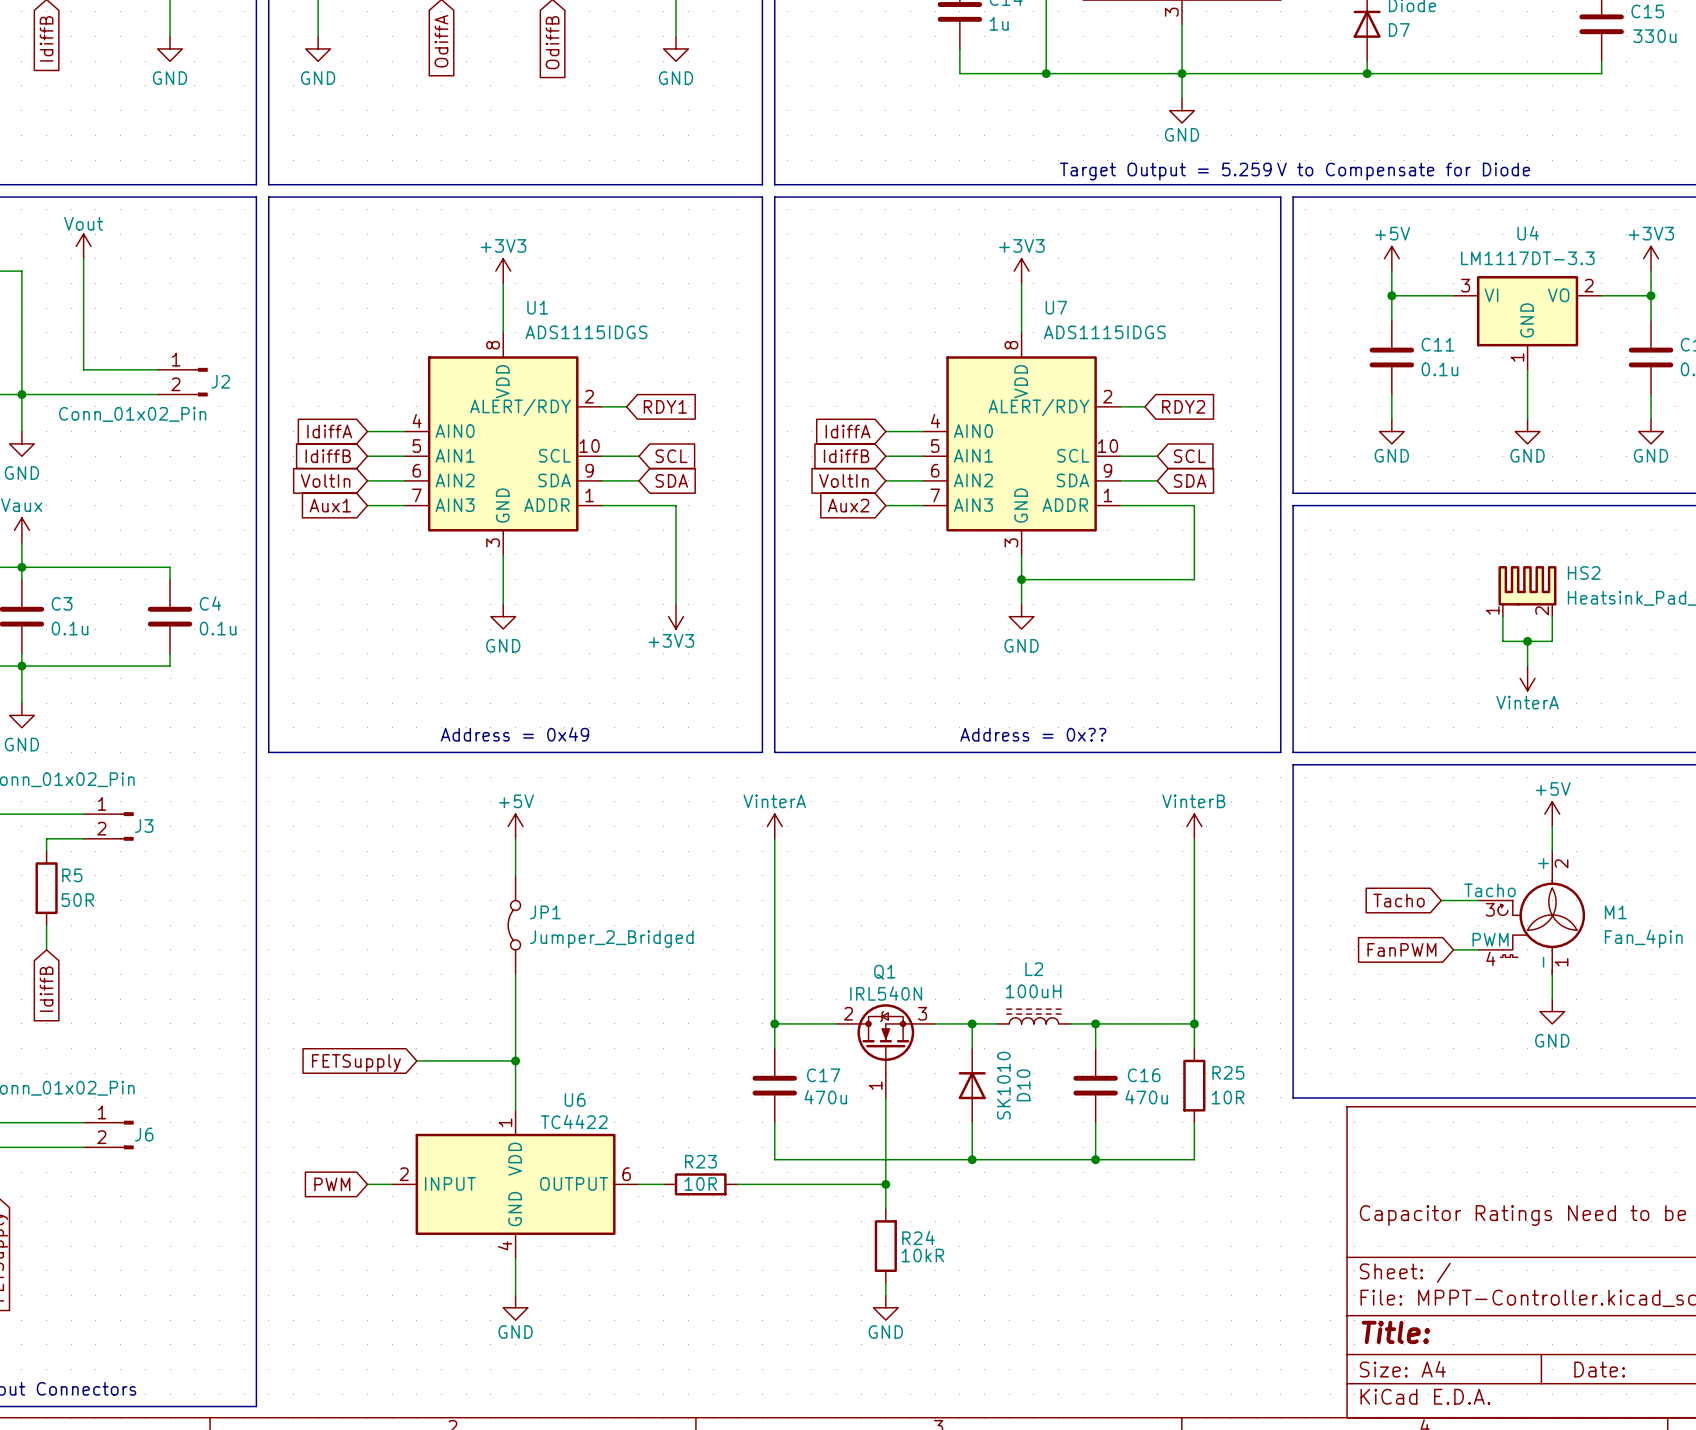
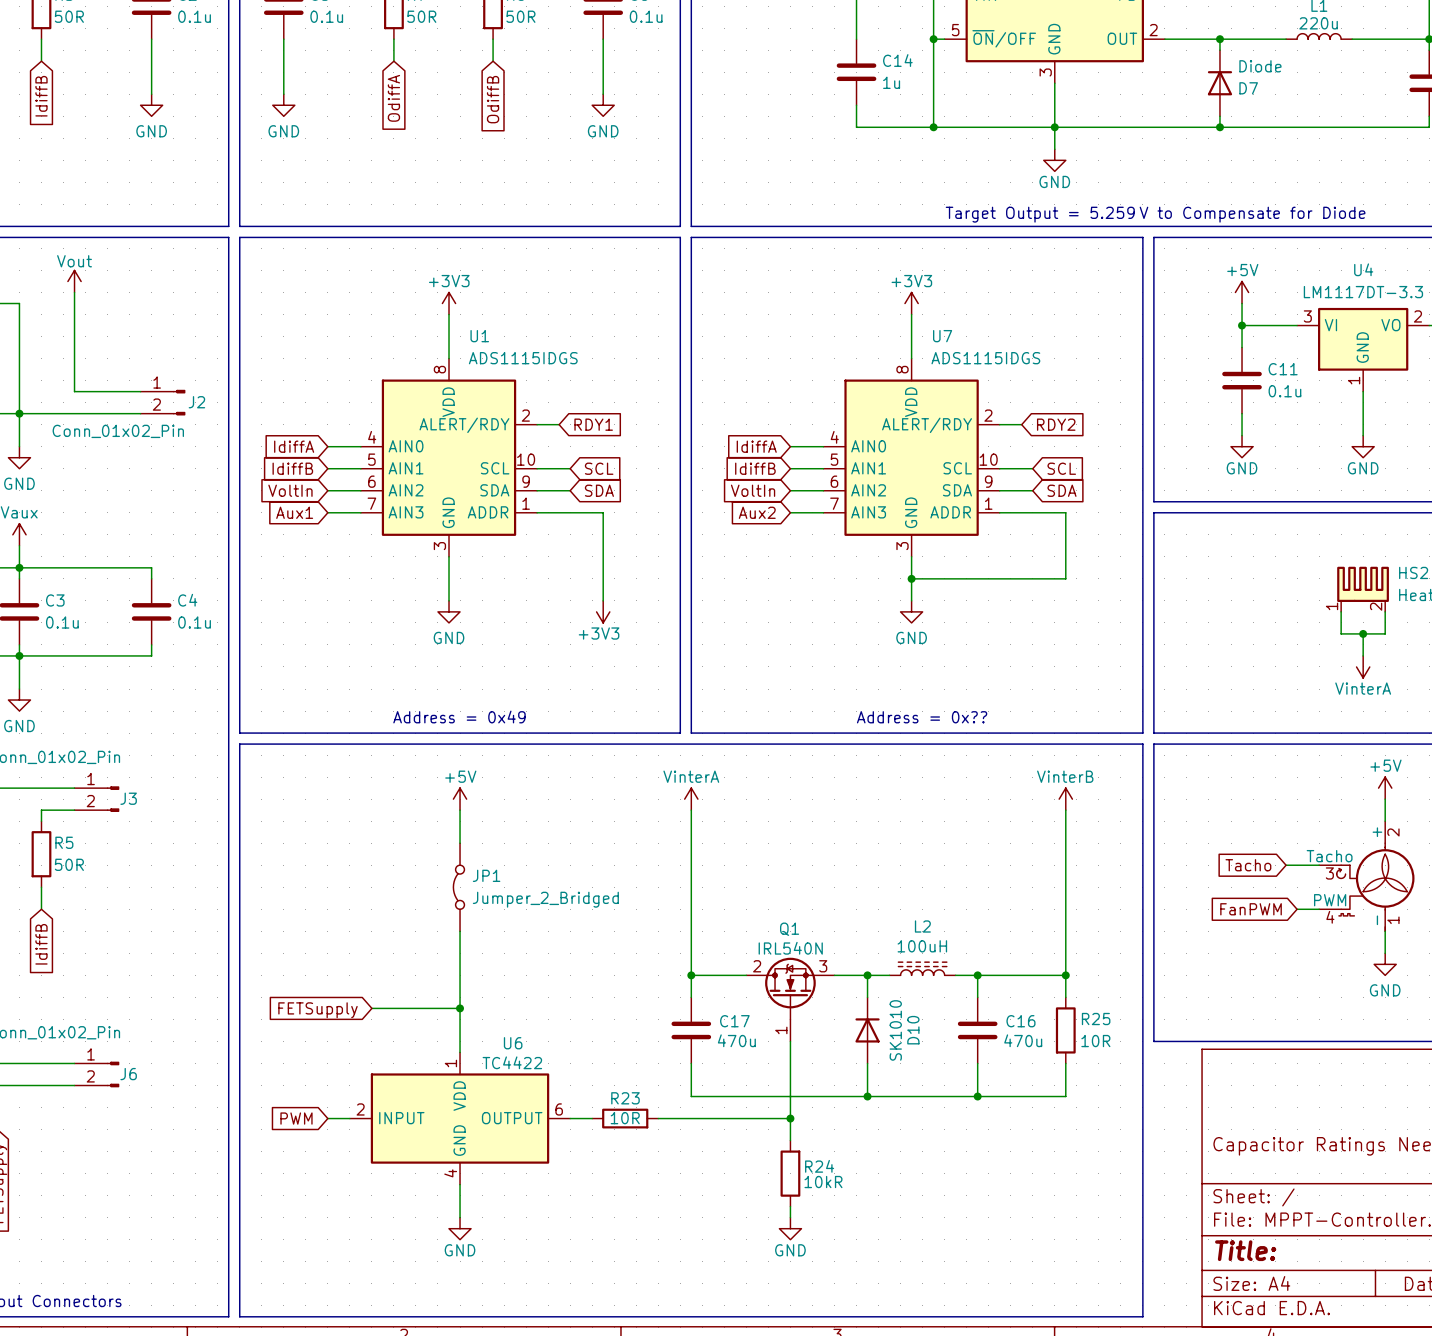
line: none -> (239, 744) (1142, 744) (1142, 1316) (239, 1316) (239, 744)

